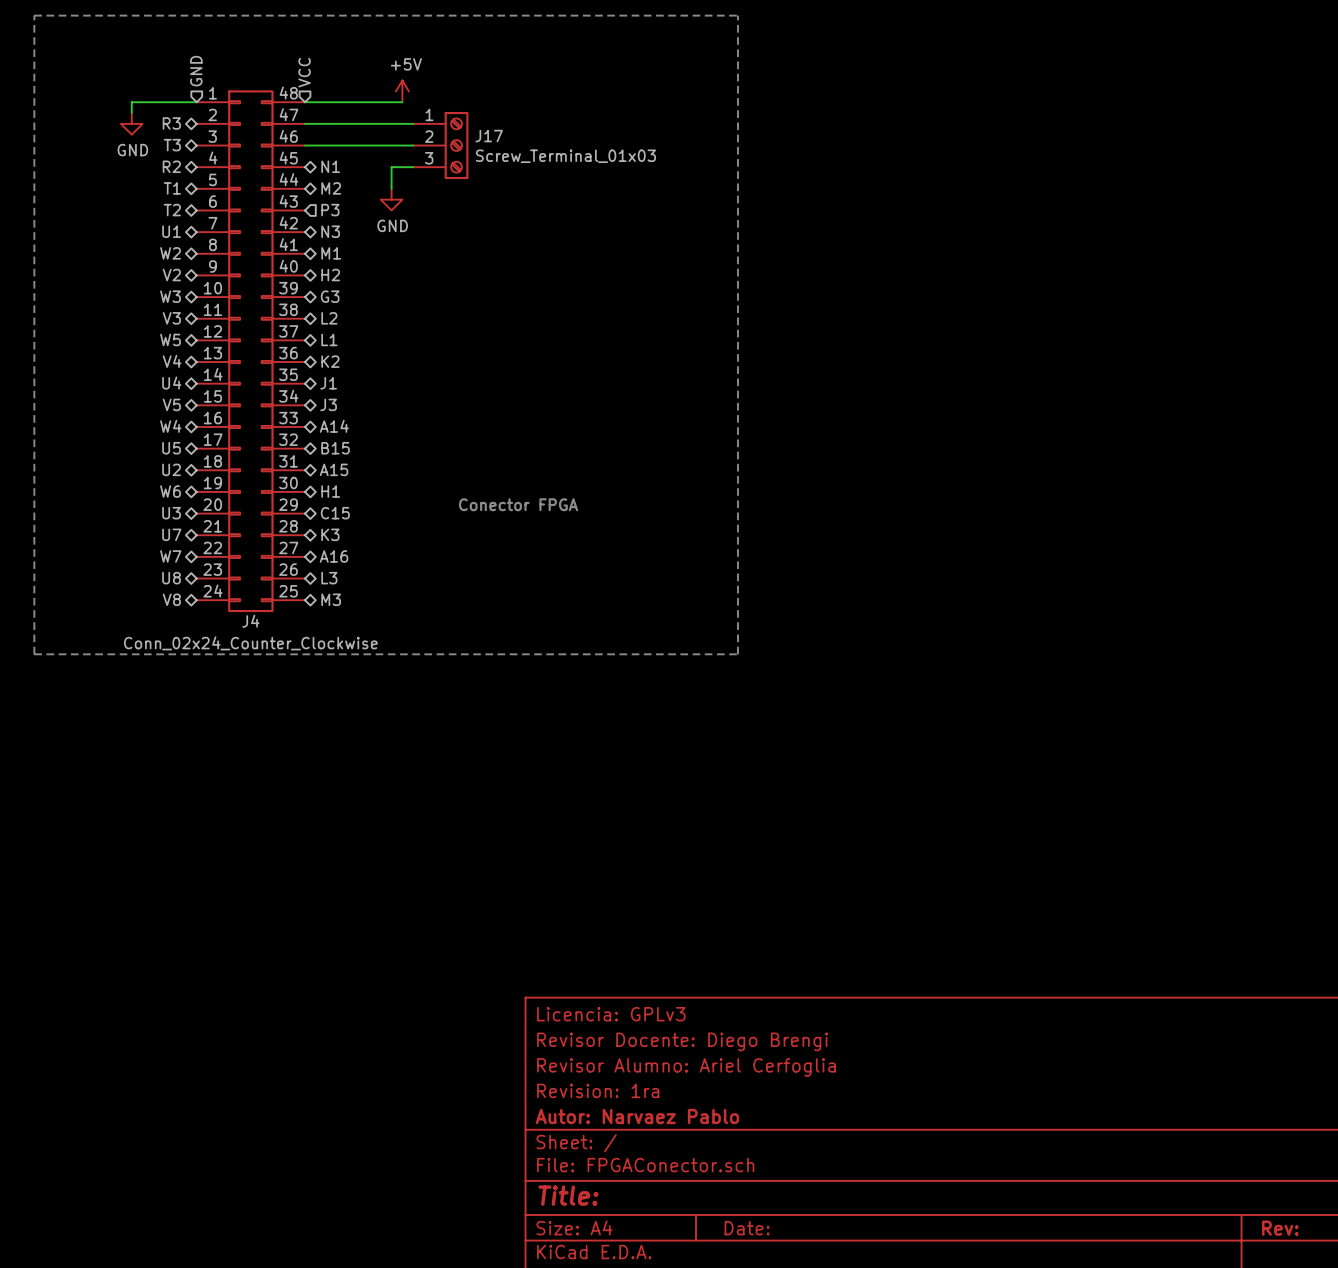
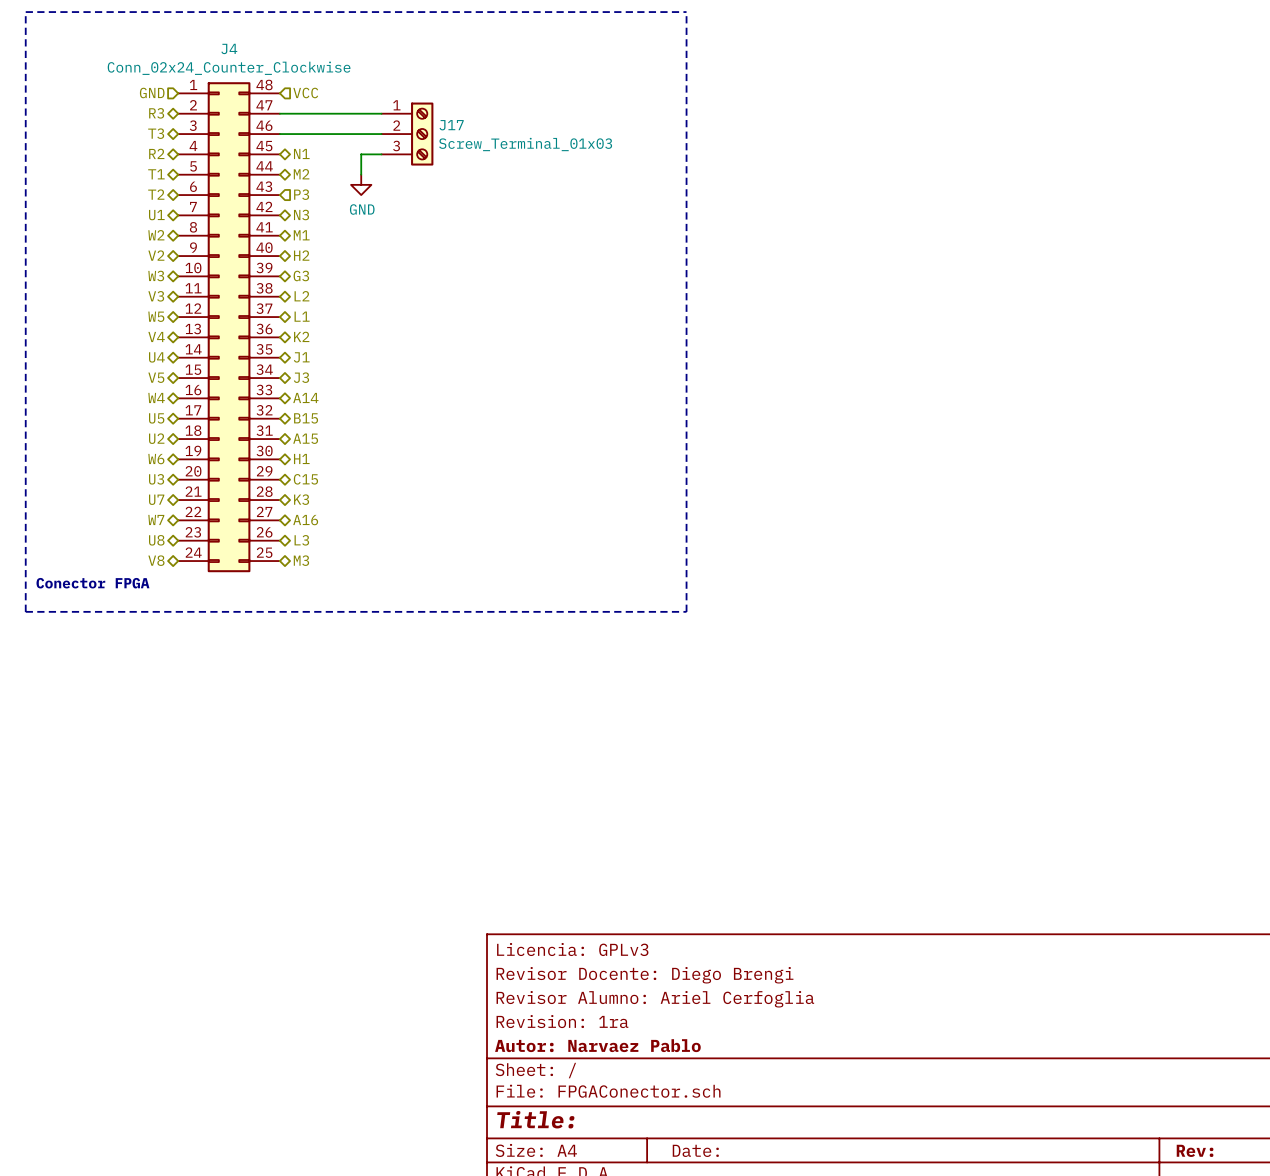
hierarchical label rotation: 0° (196, 71) -> 90° counterclockwise (152, 93)
hierarchical label position: GND (196, 71) -> GND (152, 93)
hierarchical label rotation: 0° (304, 72) -> 90° clockwise (305, 93)
hierarchical label position: VCC (304, 72) -> VCC (305, 93)
power symbol: +5V (402, 91) -> none
wire: (196, 102) (131, 102) (131, 113) -> none
wire: (304, 102) (402, 102) -> none
power symbol: GND (131, 123) -> none
text: Conector FPGA (518, 504) -> none
J4 name position: J4 (250, 621) -> J4 (229, 48)
text: none -> Conector FPGA (92, 583)
J4 value position: Conn_02x24_Counter_Clockwise (250, 643) -> Conn_02x24_Counter_Clockwise (229, 68)

